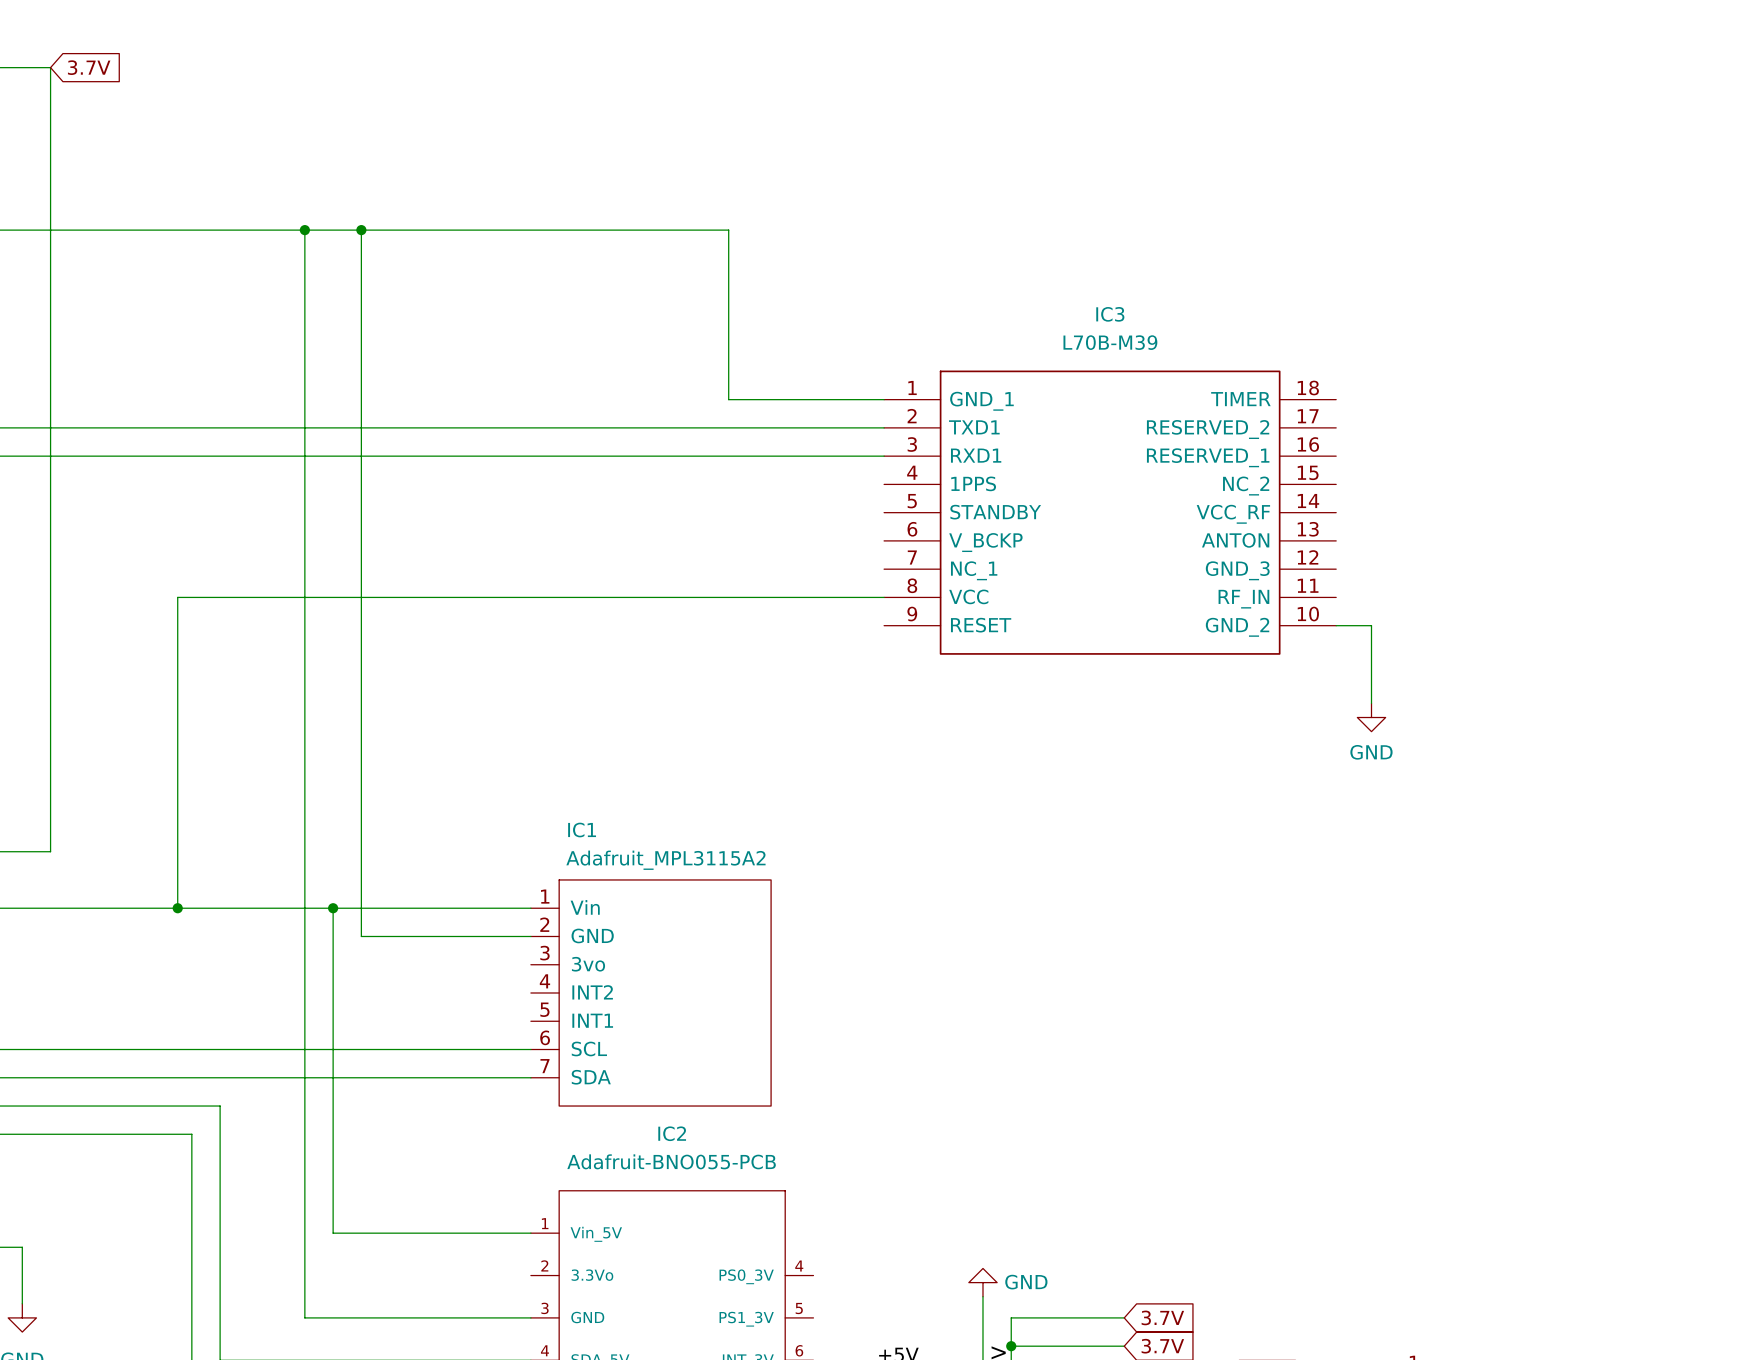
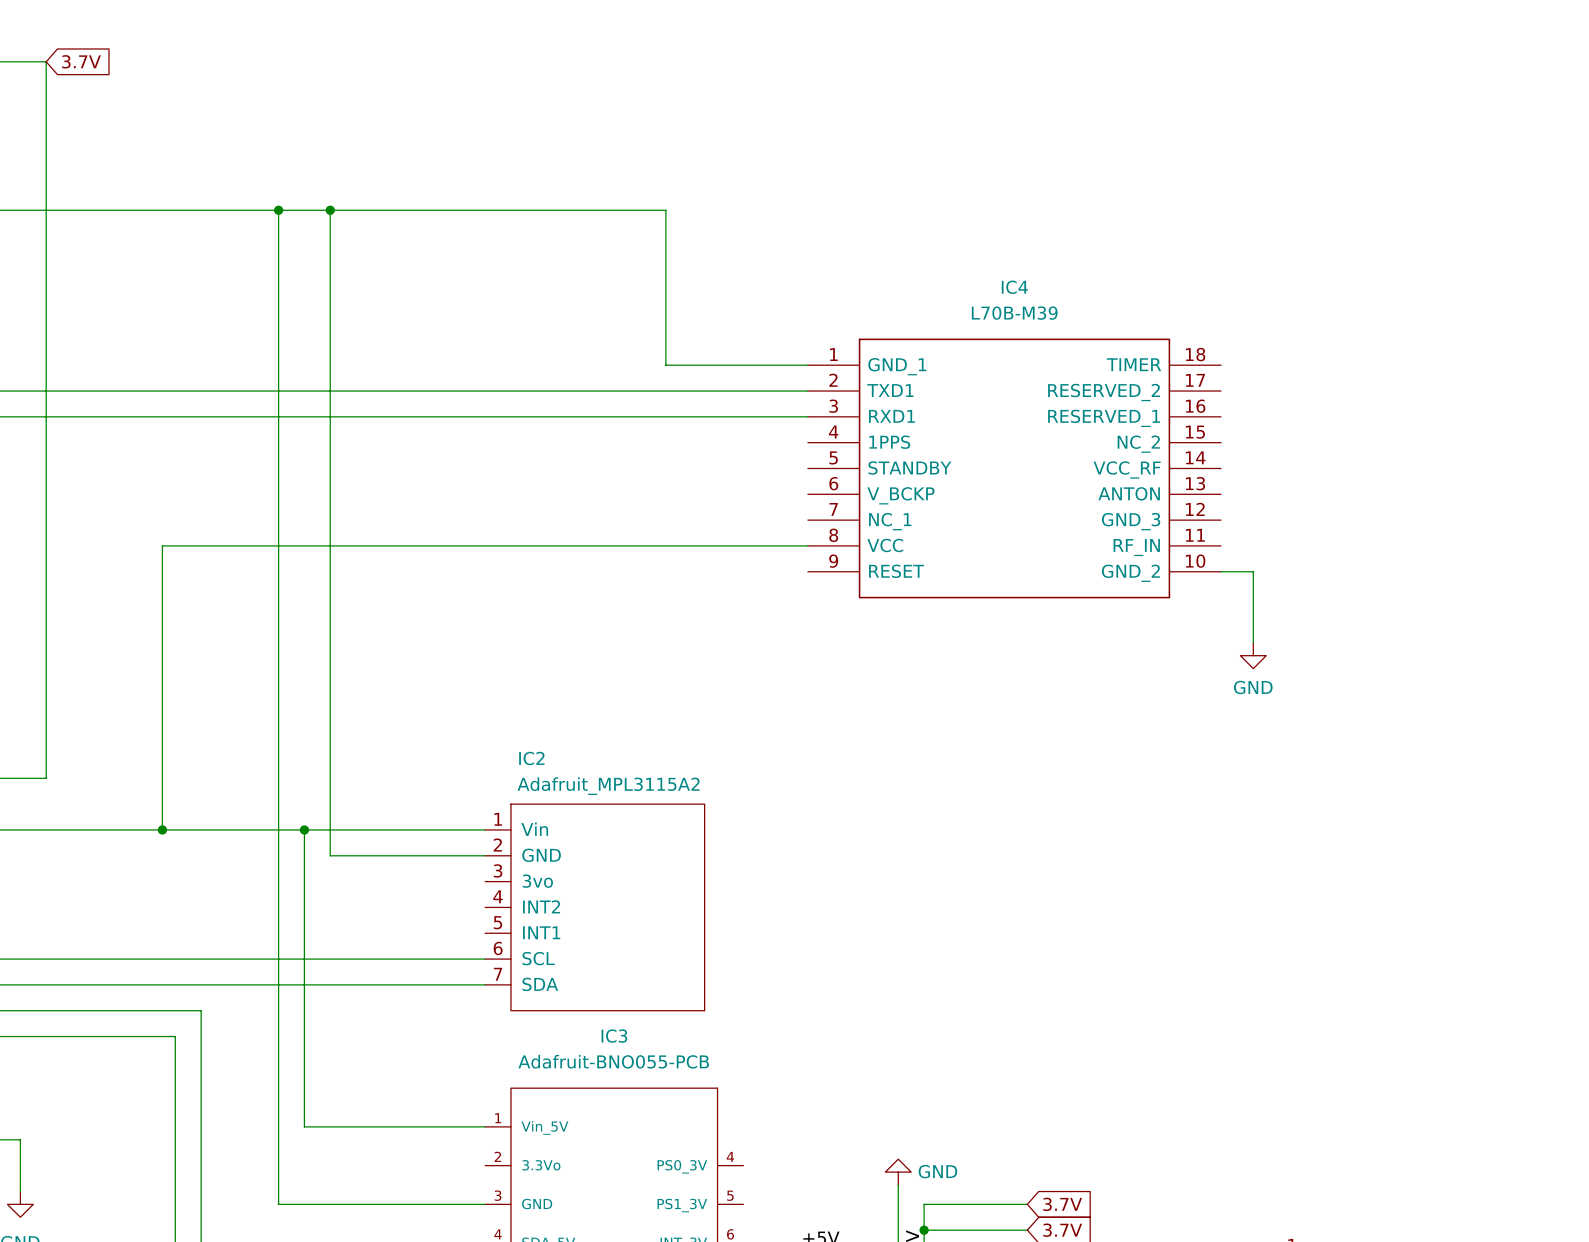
IC3 name: IC3 (1110, 314) -> IC4 (1014, 287)
IC1 name: IC1 (582, 830) -> IC2 (531, 758)
IC2 name: IC2 (672, 1133) -> IC3 (614, 1036)

